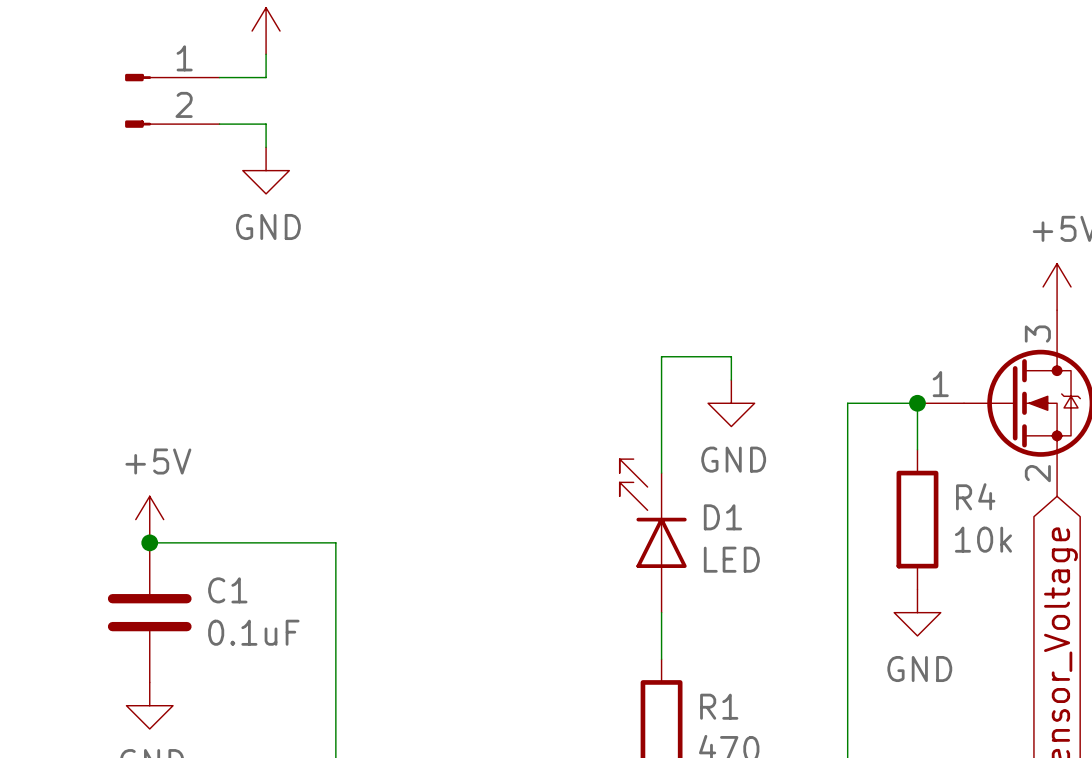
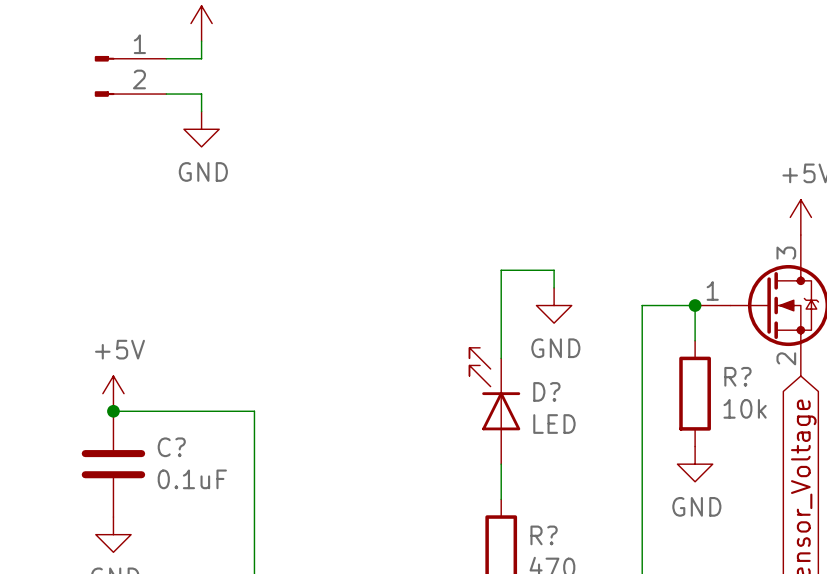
R4 name: R4 (975, 496) -> R? (737, 376)
D1 name: D1 (722, 517) -> D? (546, 391)
C1 name: C1 (227, 590) -> C? (171, 447)
R1 name: R1 (719, 706) -> R? (544, 535)

